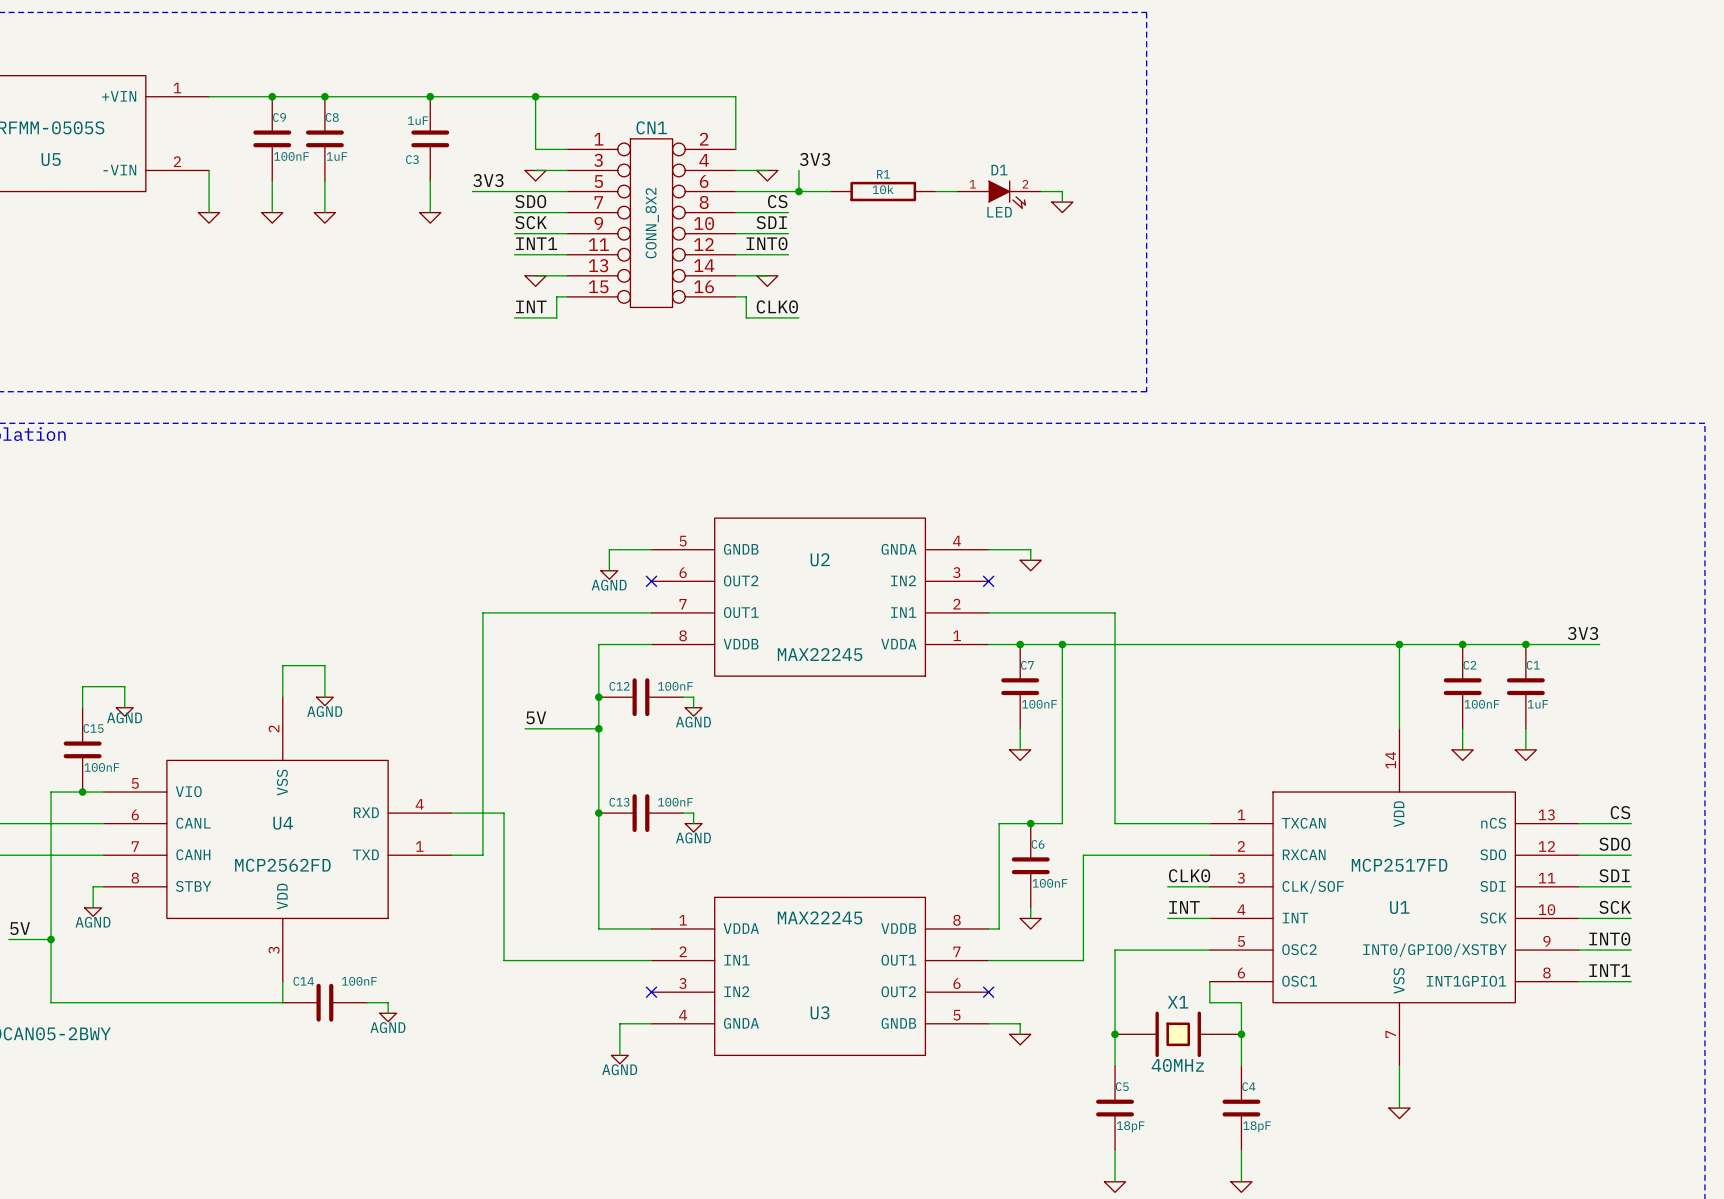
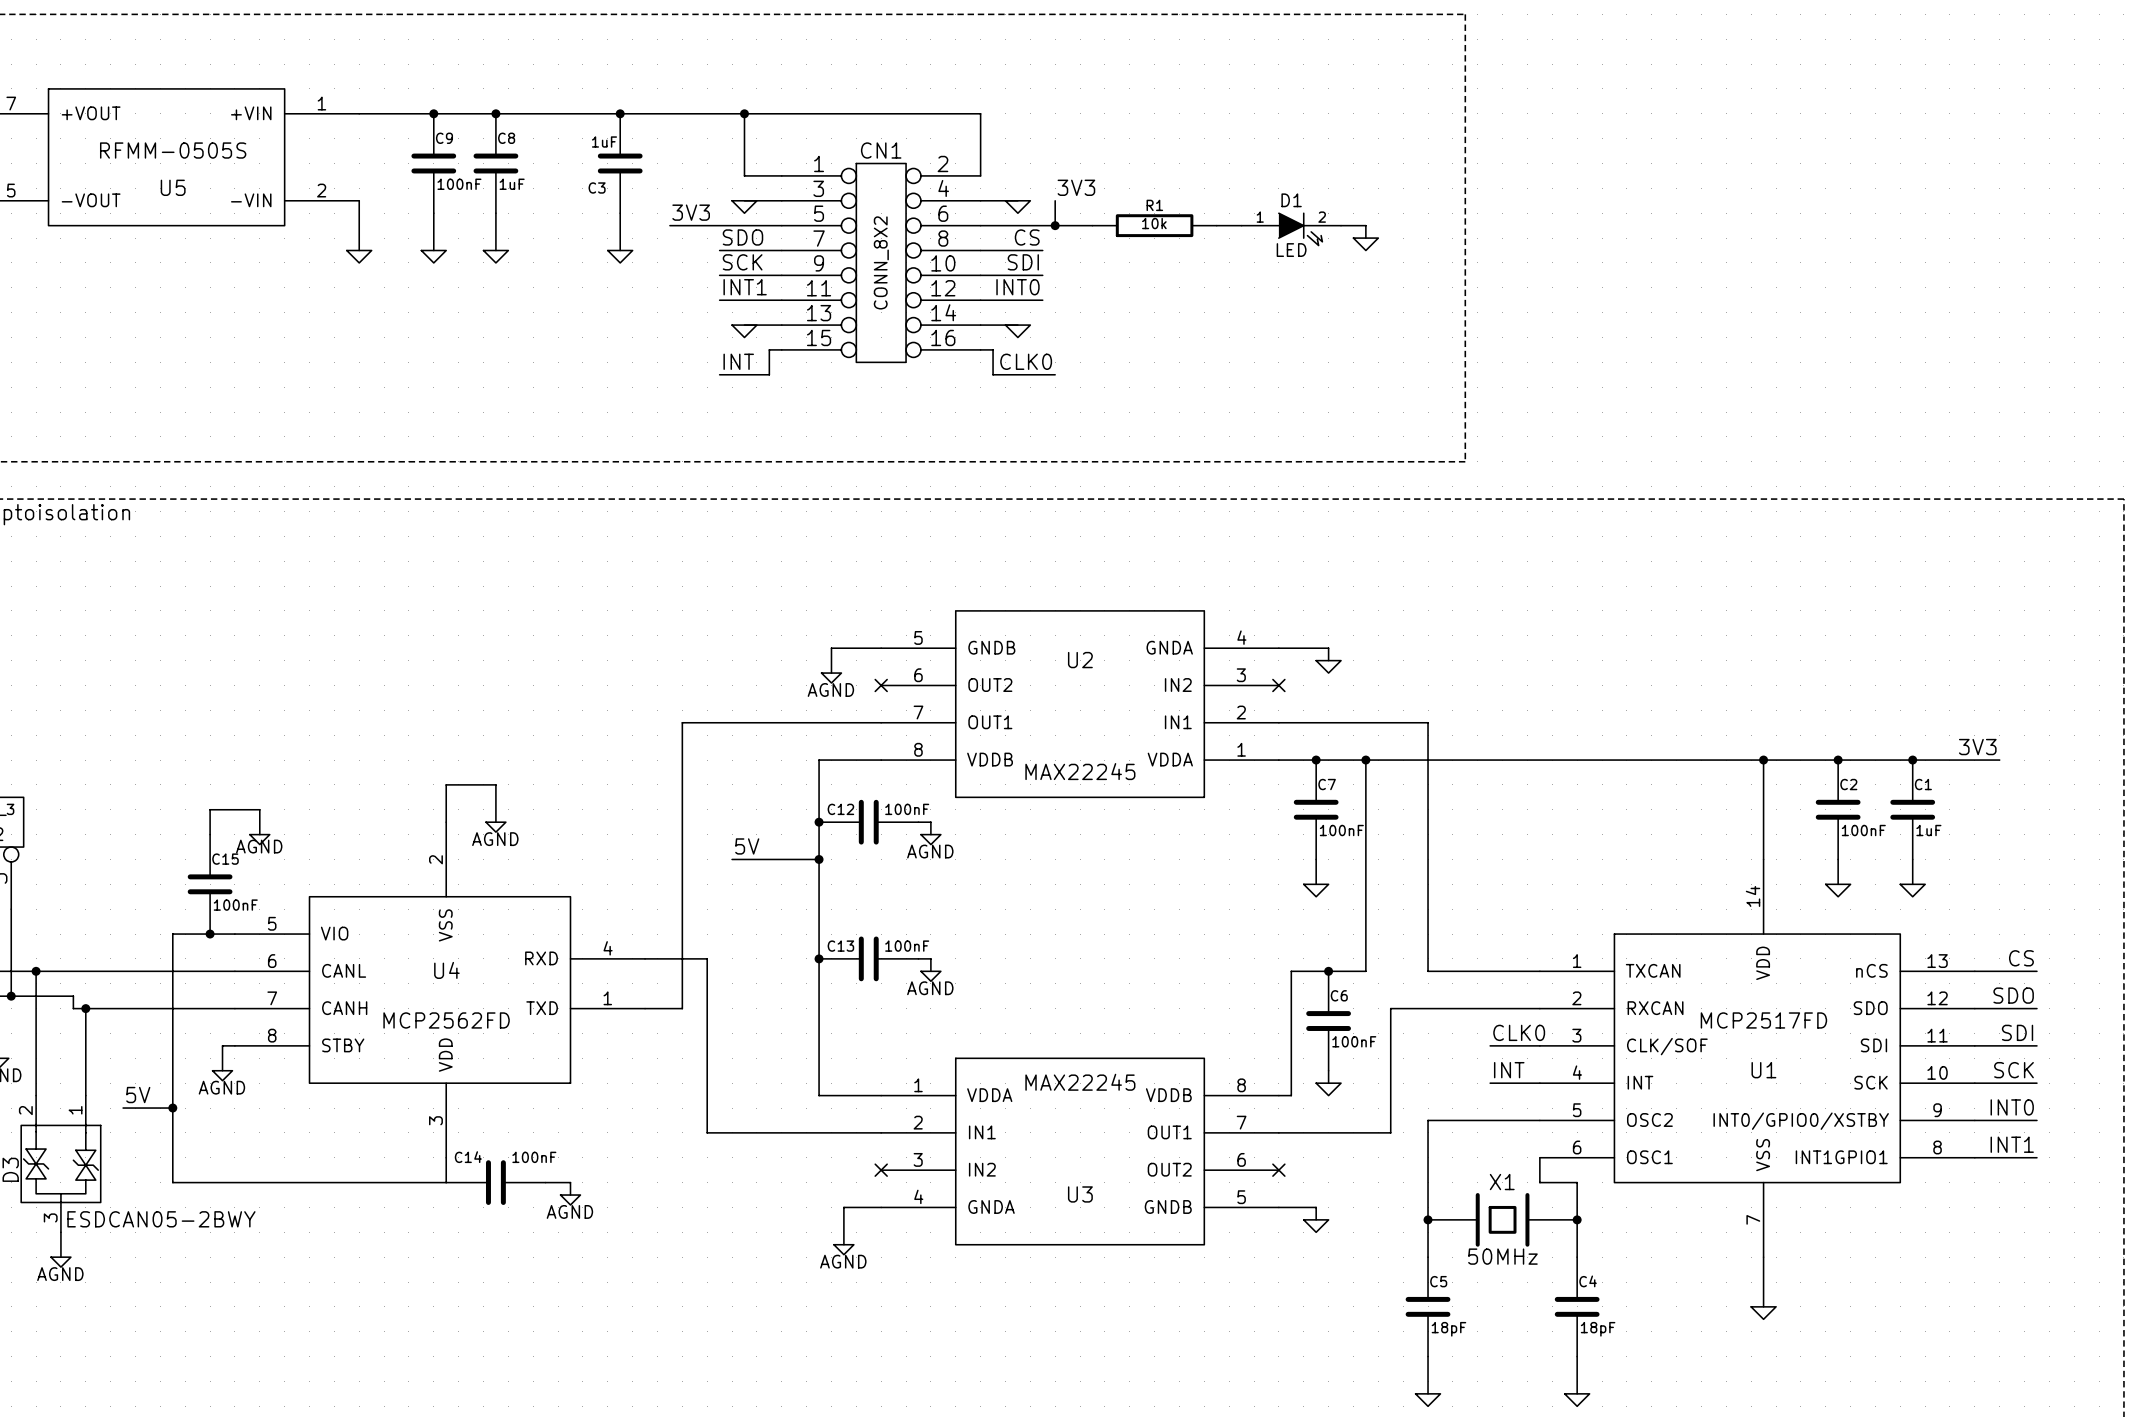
X1 value: 40MHz (1177, 1065) -> 50MHz (1502, 1256)

